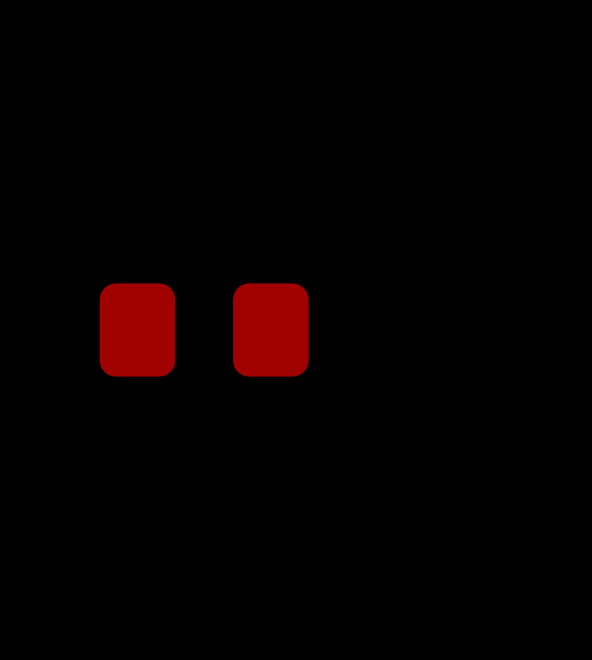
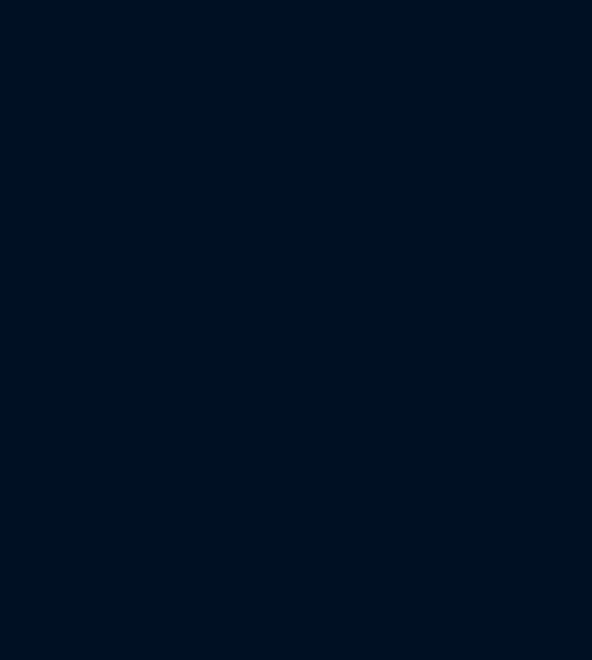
part: (204, 330) -> none

